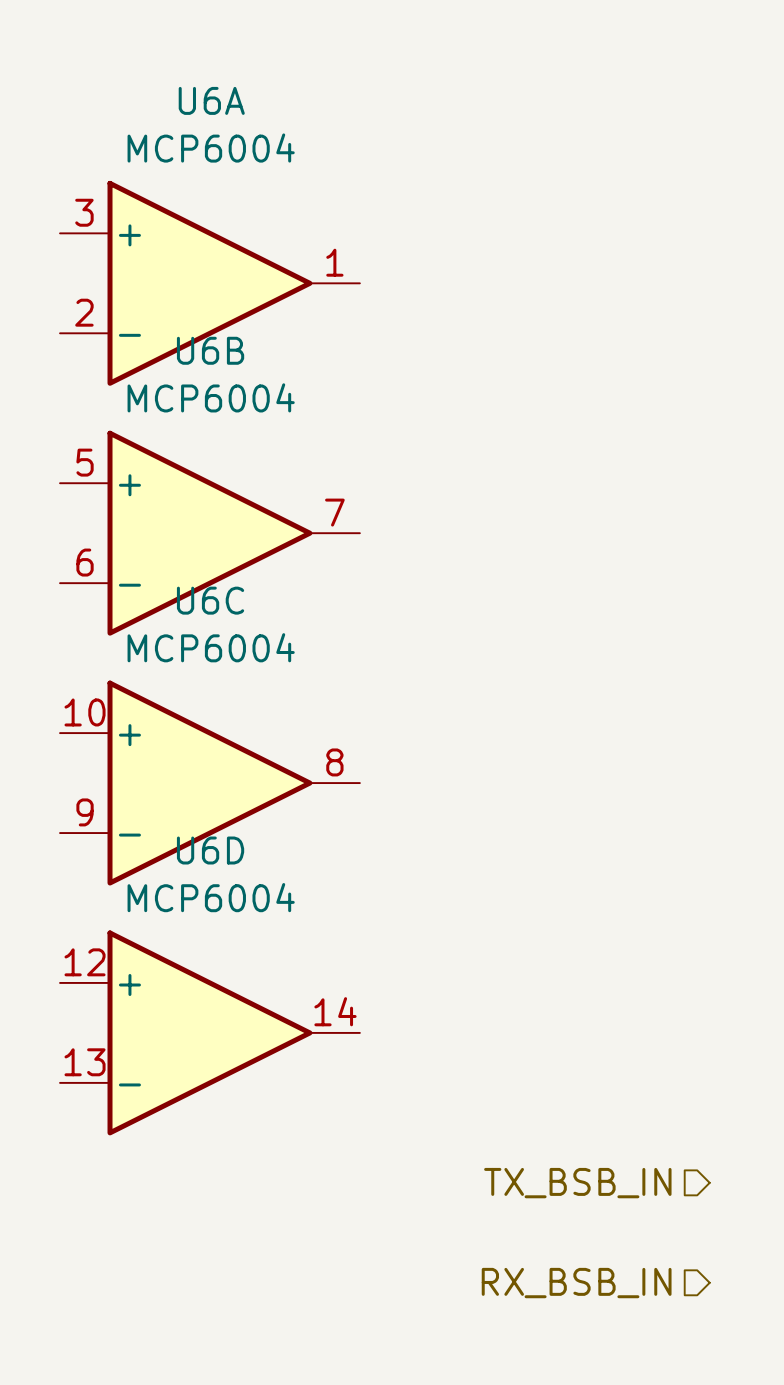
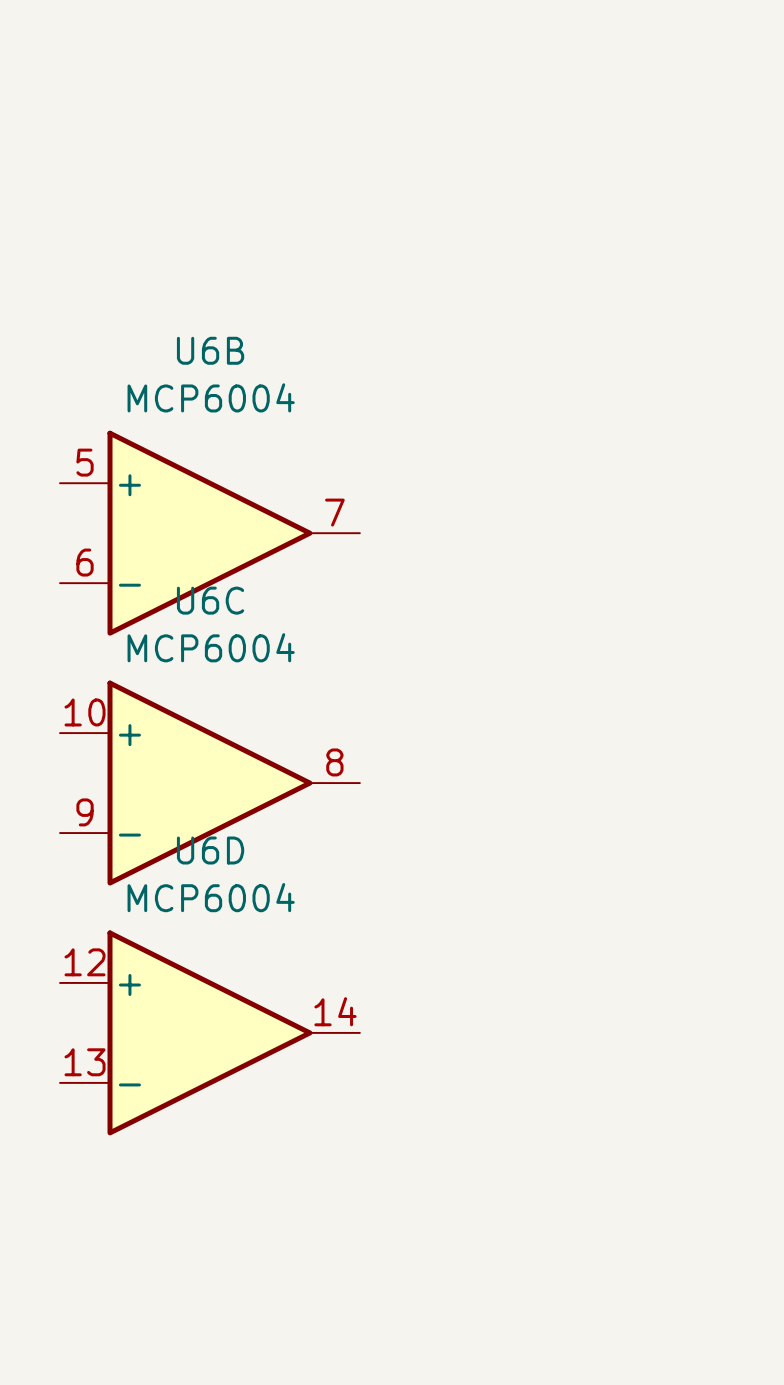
U6A: MCP6004 (209, 283) -> none
hierarchical label: TX_BSB_IN (577, 1183) -> none
hierarchical label: RX_BSB_IN (576, 1283) -> none

